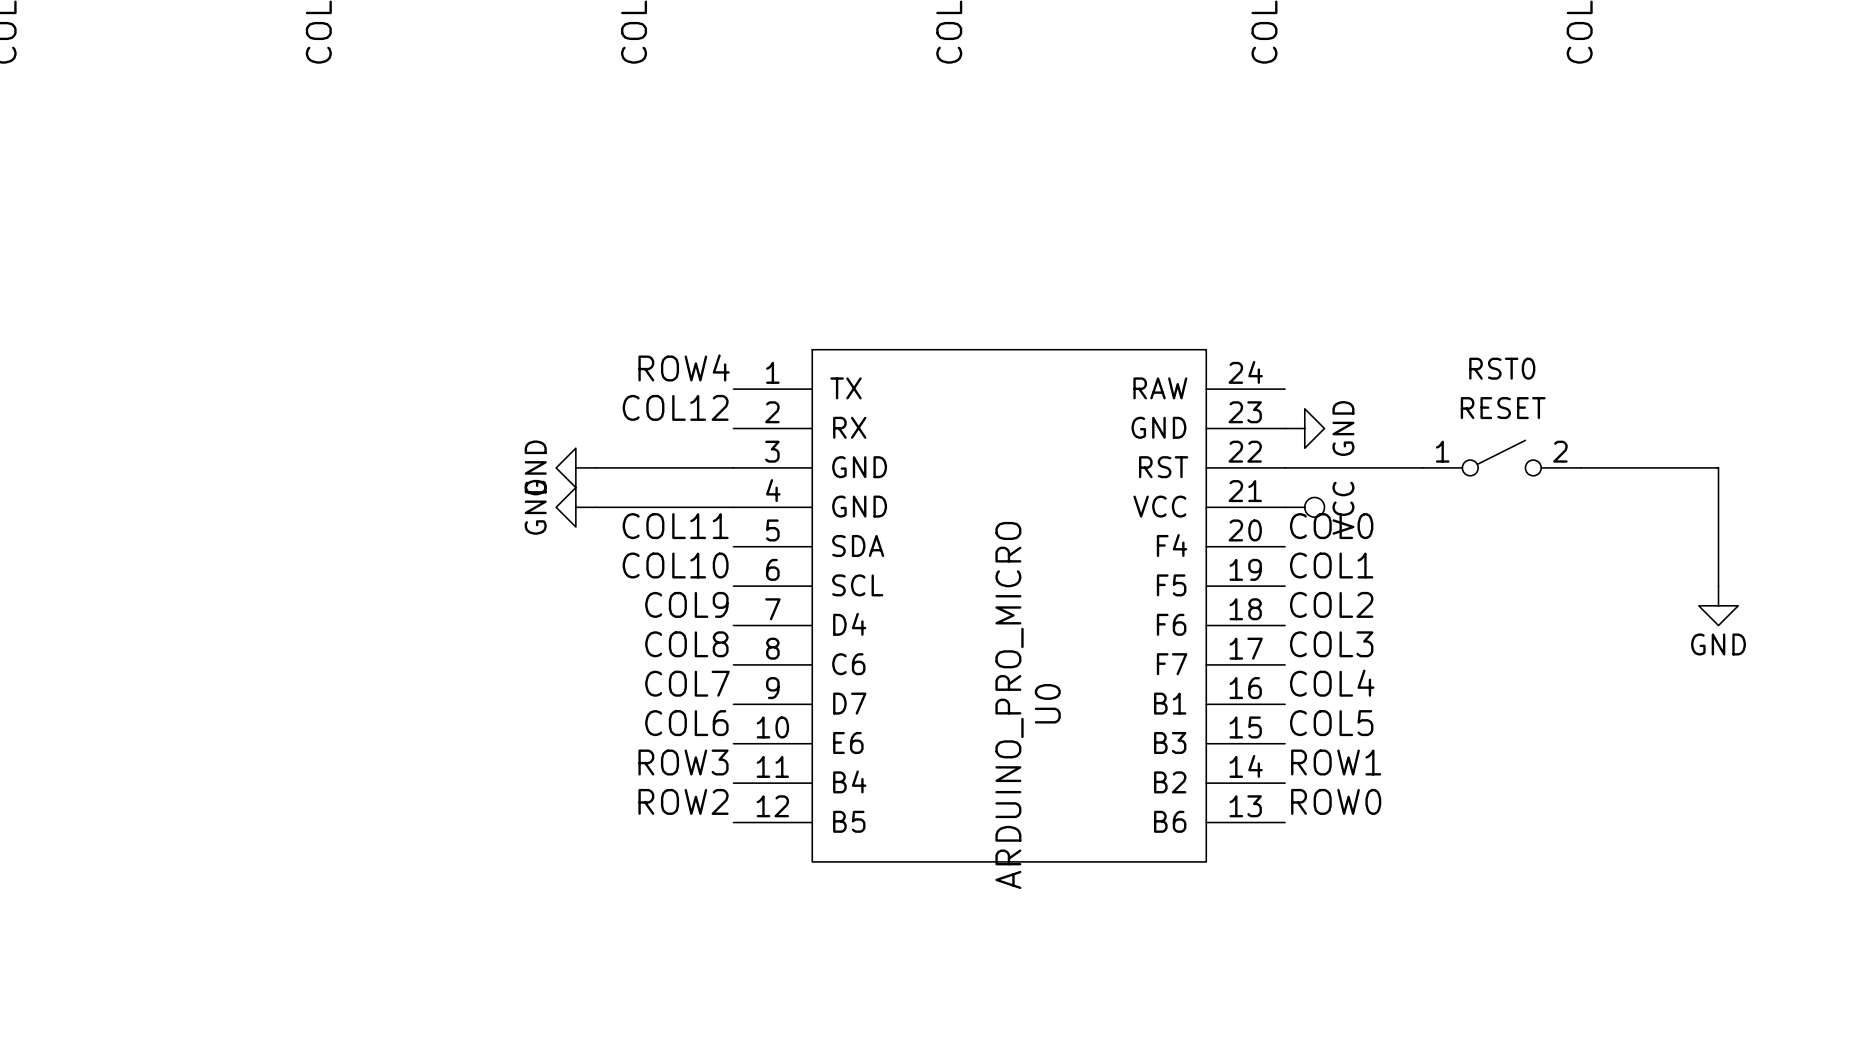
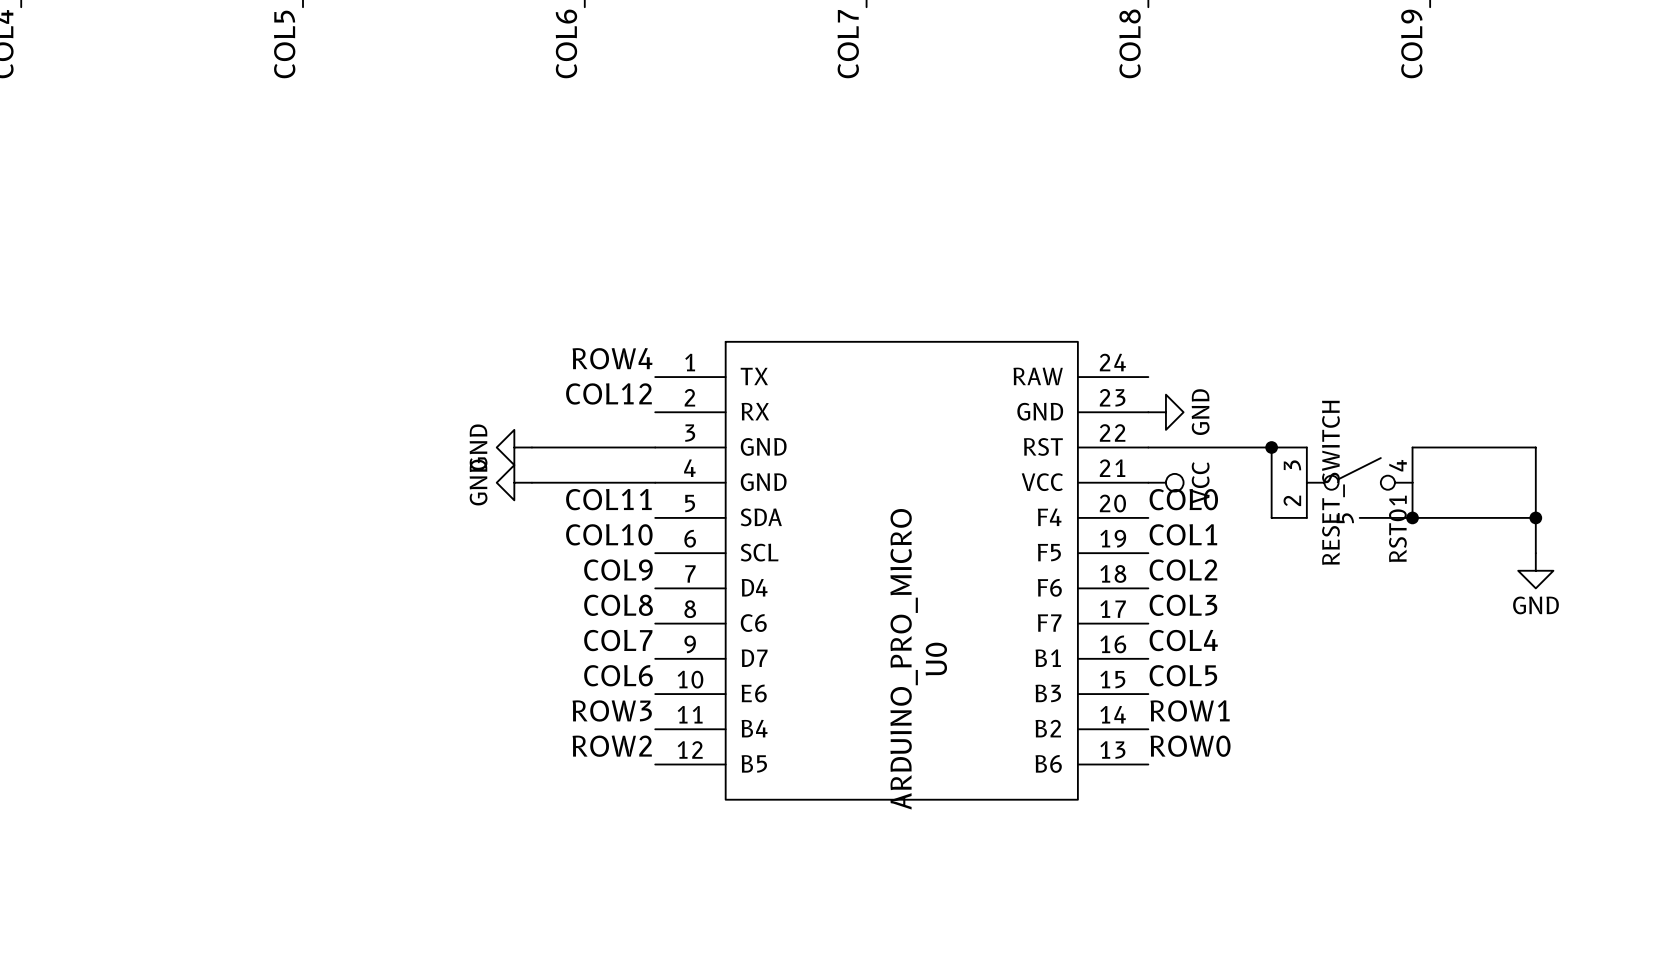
RST0 name position: RST0 (1502, 368) -> RST0 (1397, 535)
RST0 value: RESET (1503, 408) -> RESET_SWITCH (1333, 482)
RST0 symbol: [1422, 440, 1581, 476] -> [1306, 447, 1413, 518]
junction: none -> (1271, 447)
wire: none -> (1306, 447) (1271, 447) (1271, 517) (1306, 517)
wire: none -> (1359, 517) (1535, 517)
junction: none -> (1412, 517)
junction: none -> (1535, 517)

